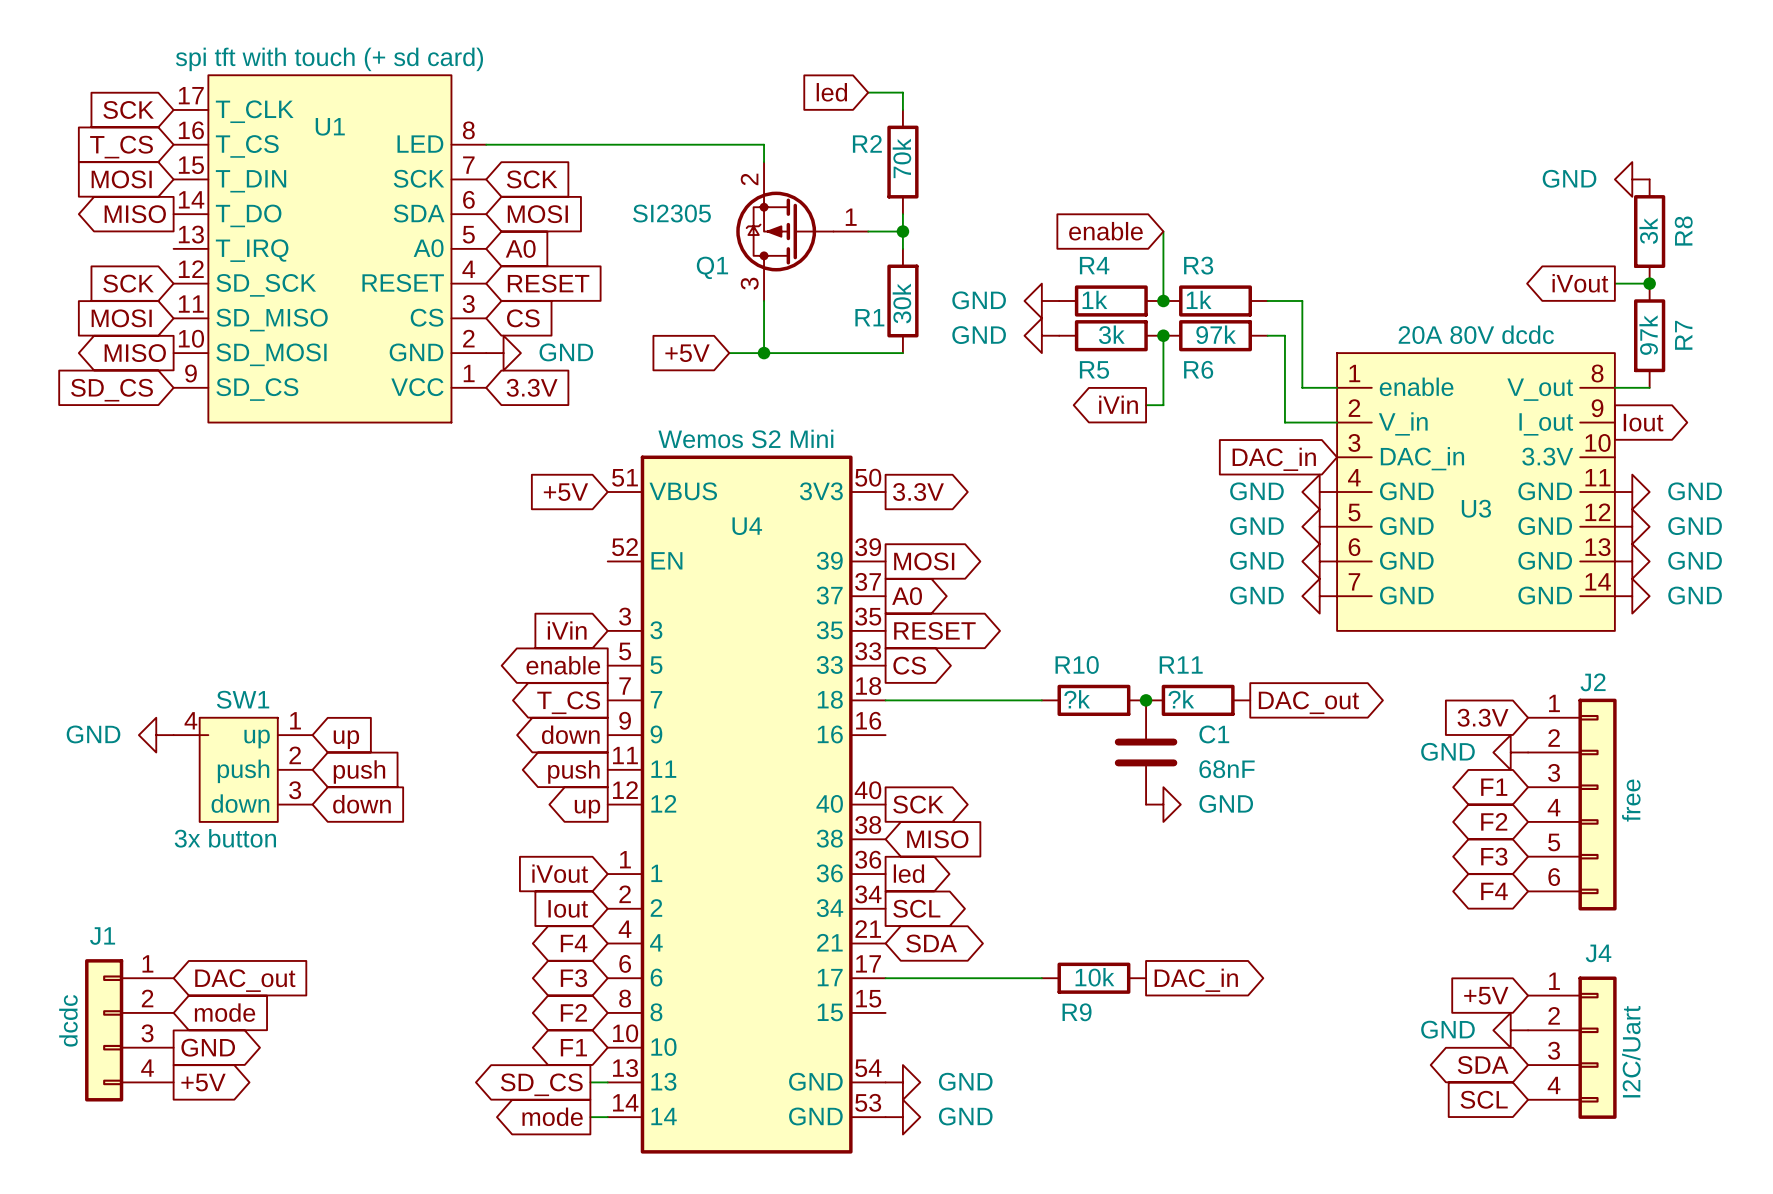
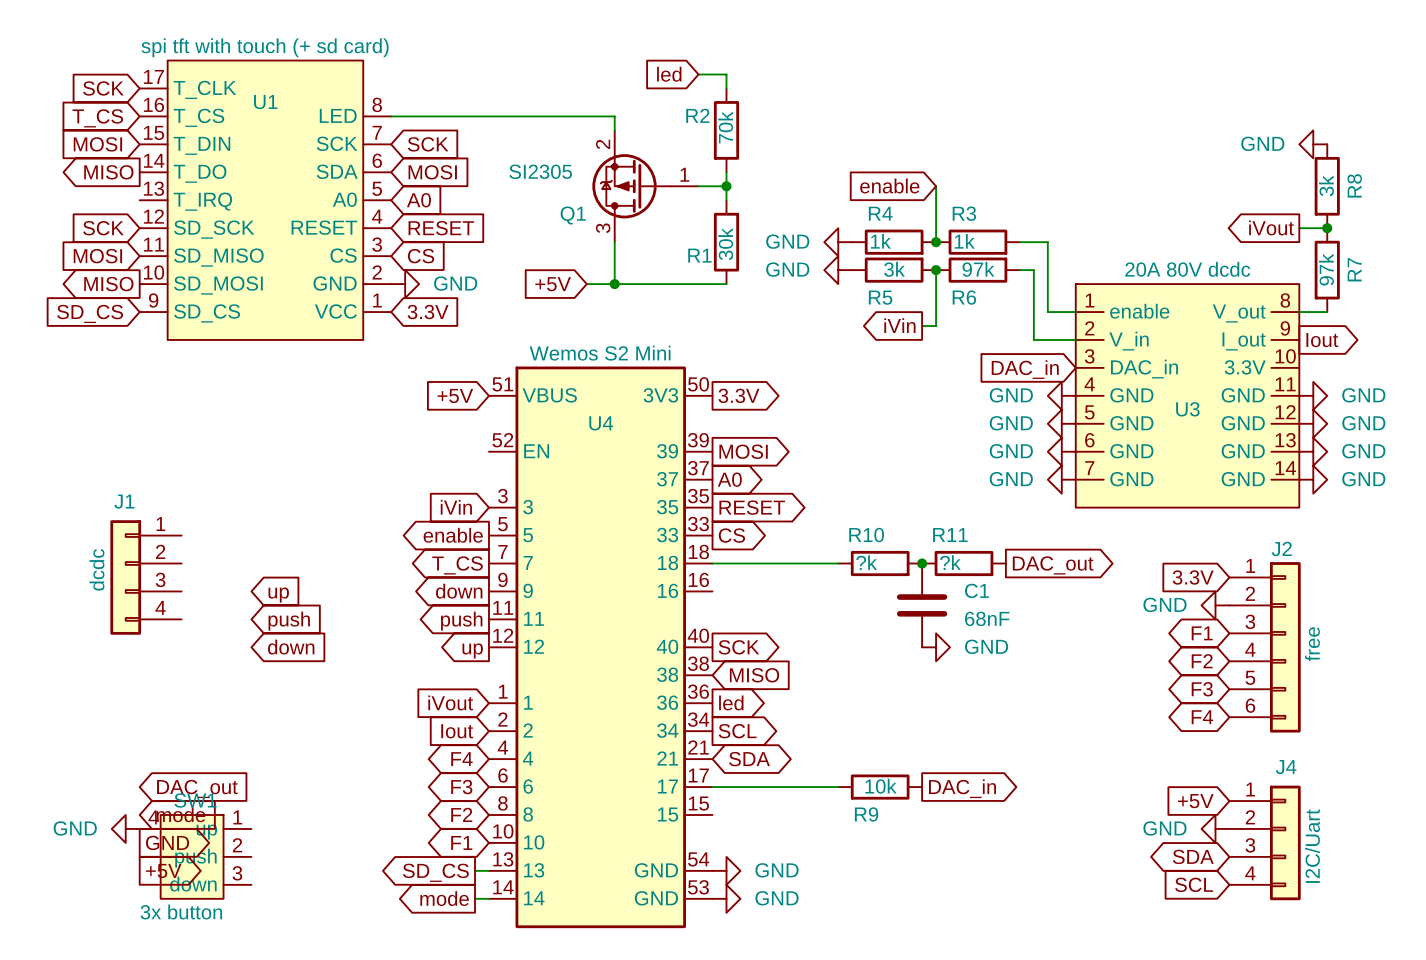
power symbol position: GND (156, 735) -> GND (125, 828)
SW1 position: (243, 769) -> (195, 856)
J1 position: (129, 1030) -> (145, 577)

